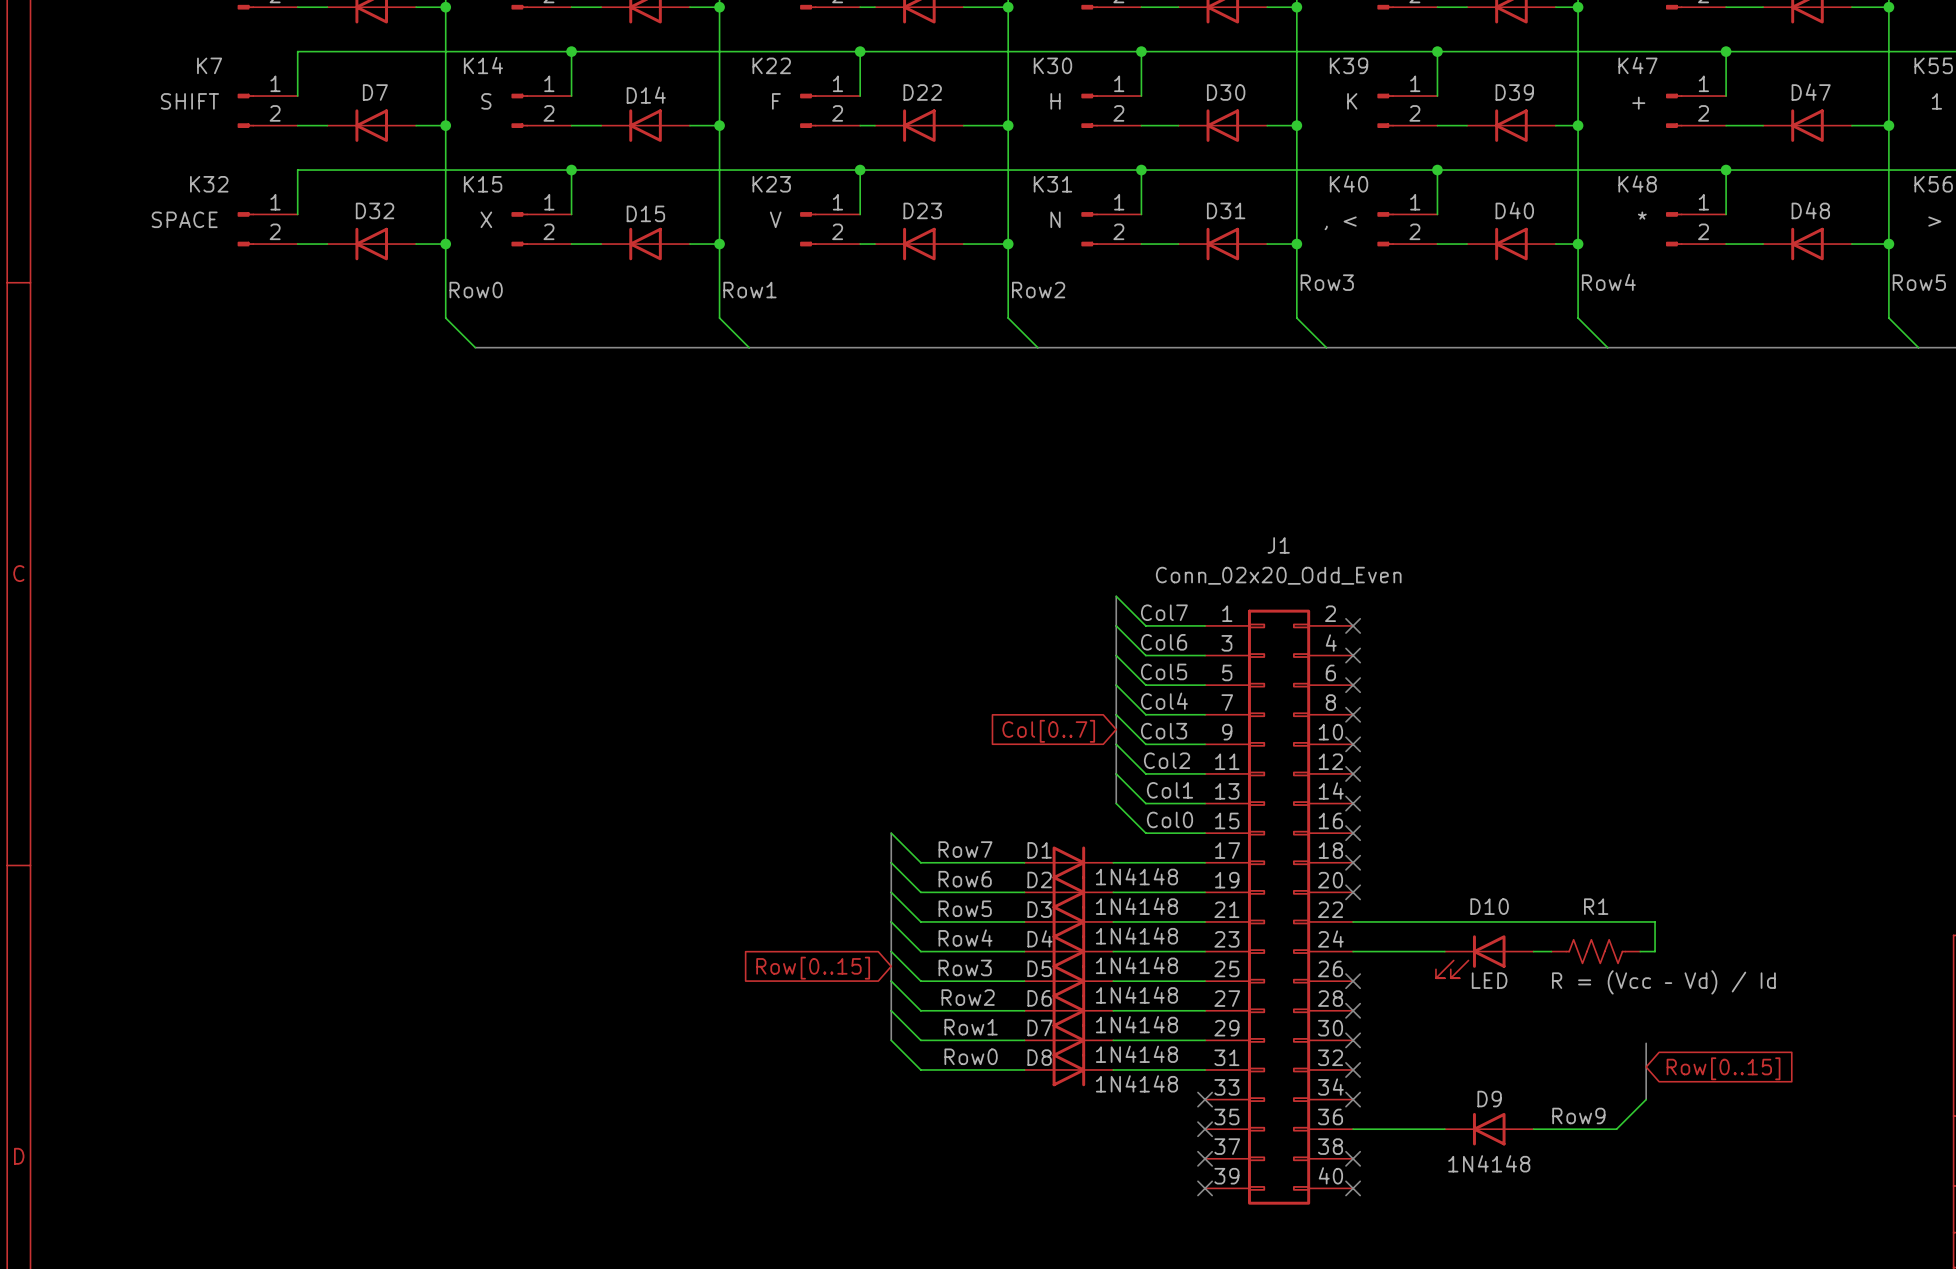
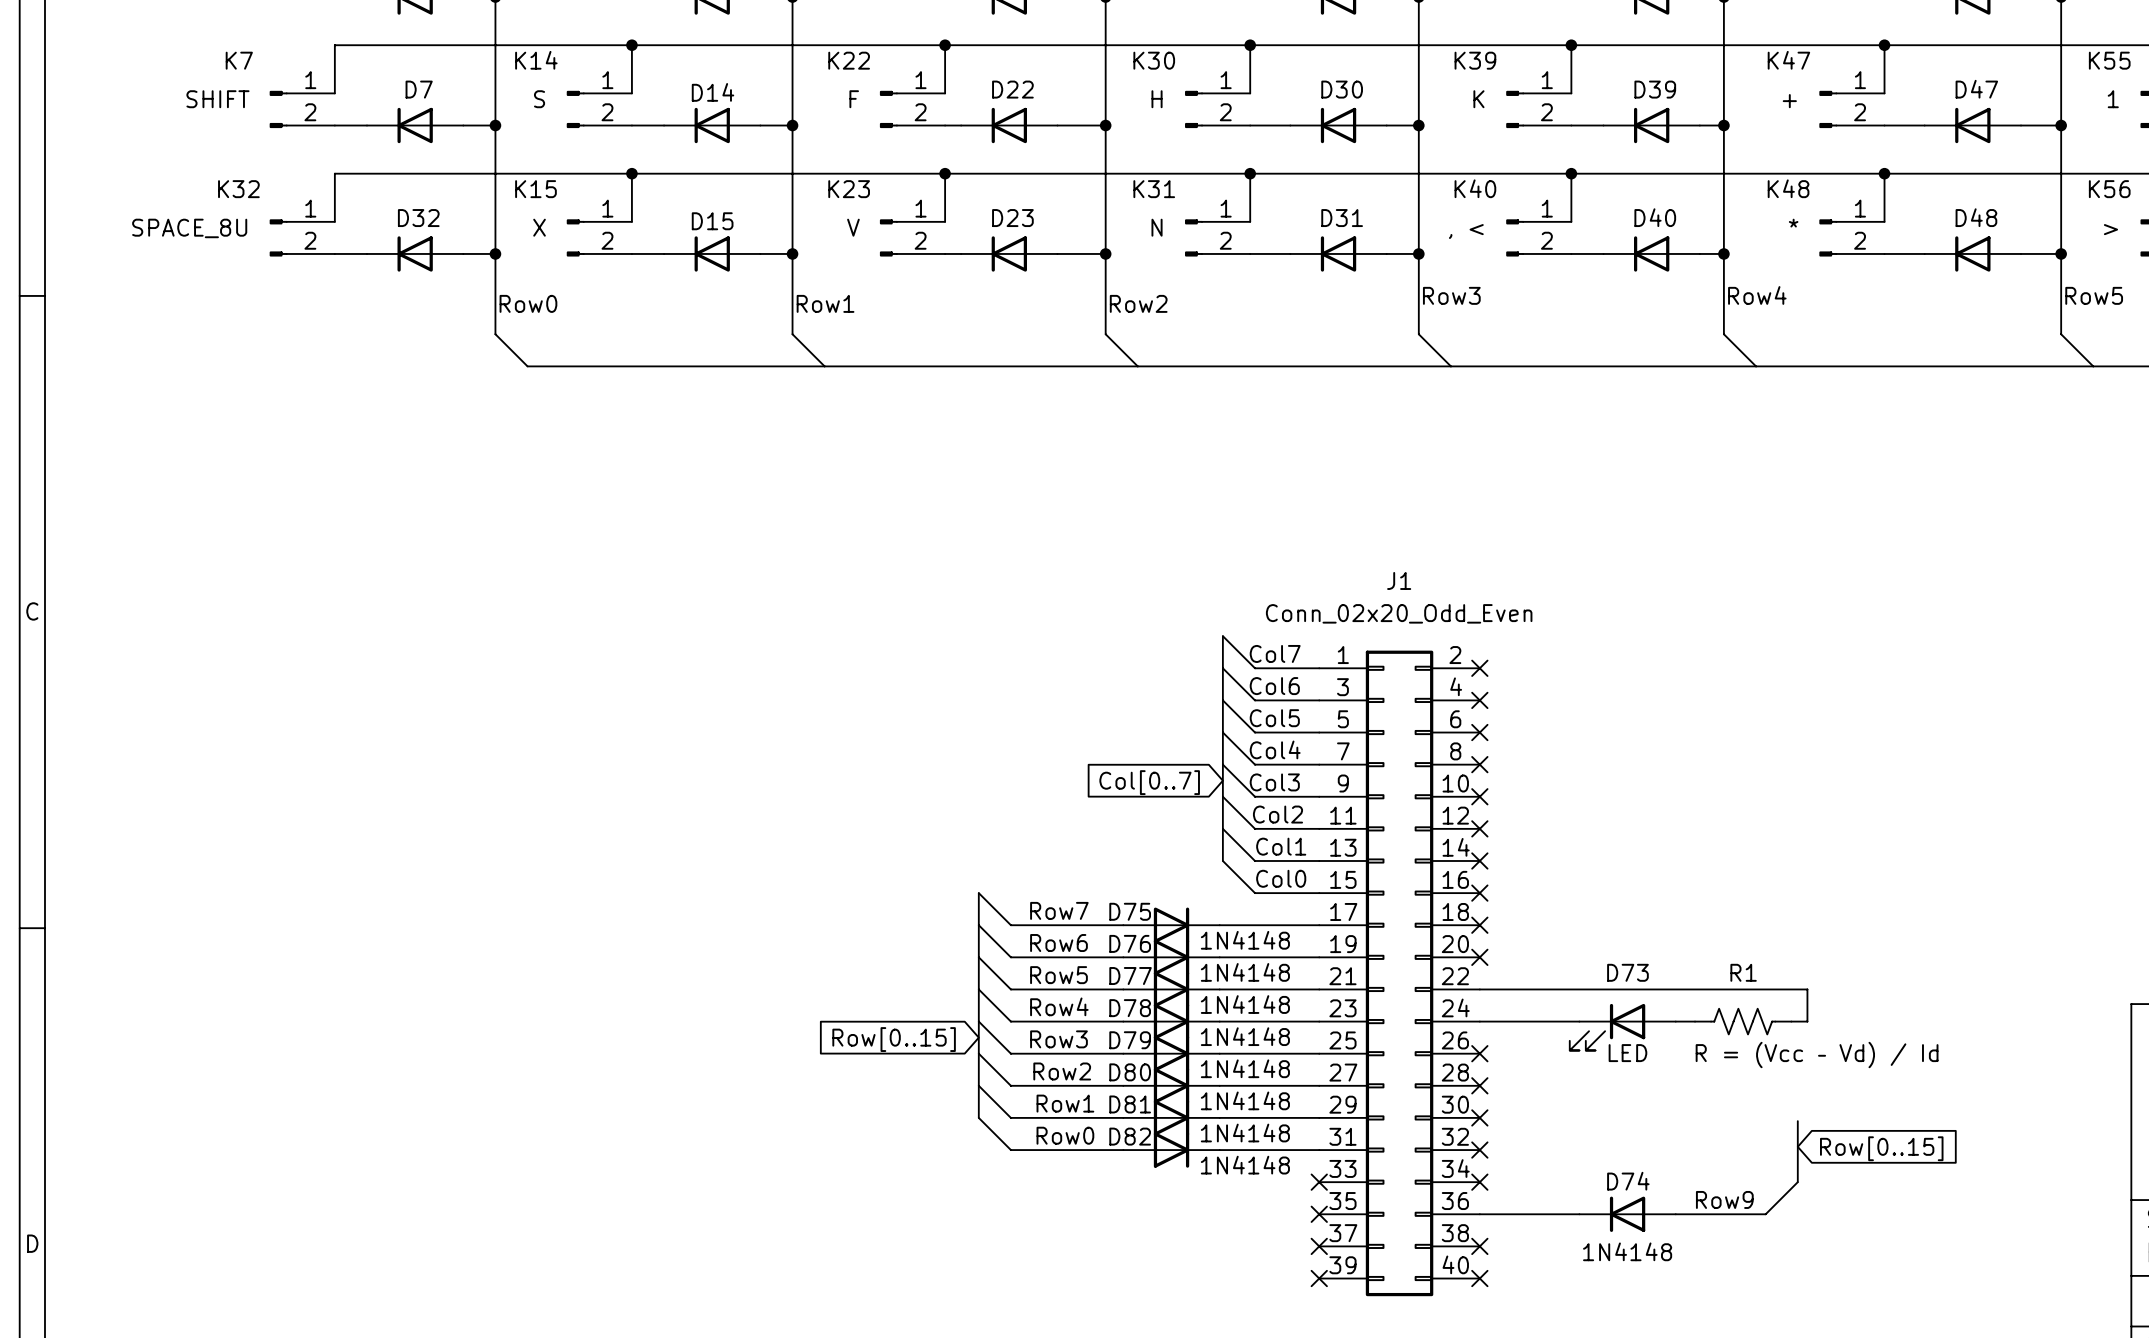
K32 value: SPACE (184, 219) -> SPACE_8U (189, 228)
D1 name: D1 (1039, 850) -> D75 (1130, 911)
D2 name: D2 (1039, 879) -> D76 (1130, 943)
D10 name: D10 (1489, 906) -> D73 (1627, 972)
D3 name: D3 (1039, 909) -> D77 (1130, 976)
D4 name: D4 (1039, 938) -> D78 (1130, 1008)
D5 name: D5 (1039, 968) -> D79 (1130, 1040)
D6 name: D6 (1039, 998) -> D80 (1130, 1072)
D7 name: D7 (1039, 1027) -> D81 (1130, 1104)
D8 name: D8 (1039, 1057) -> D82 (1130, 1136)
D9 name: D9 (1489, 1099) -> D74 (1628, 1181)

